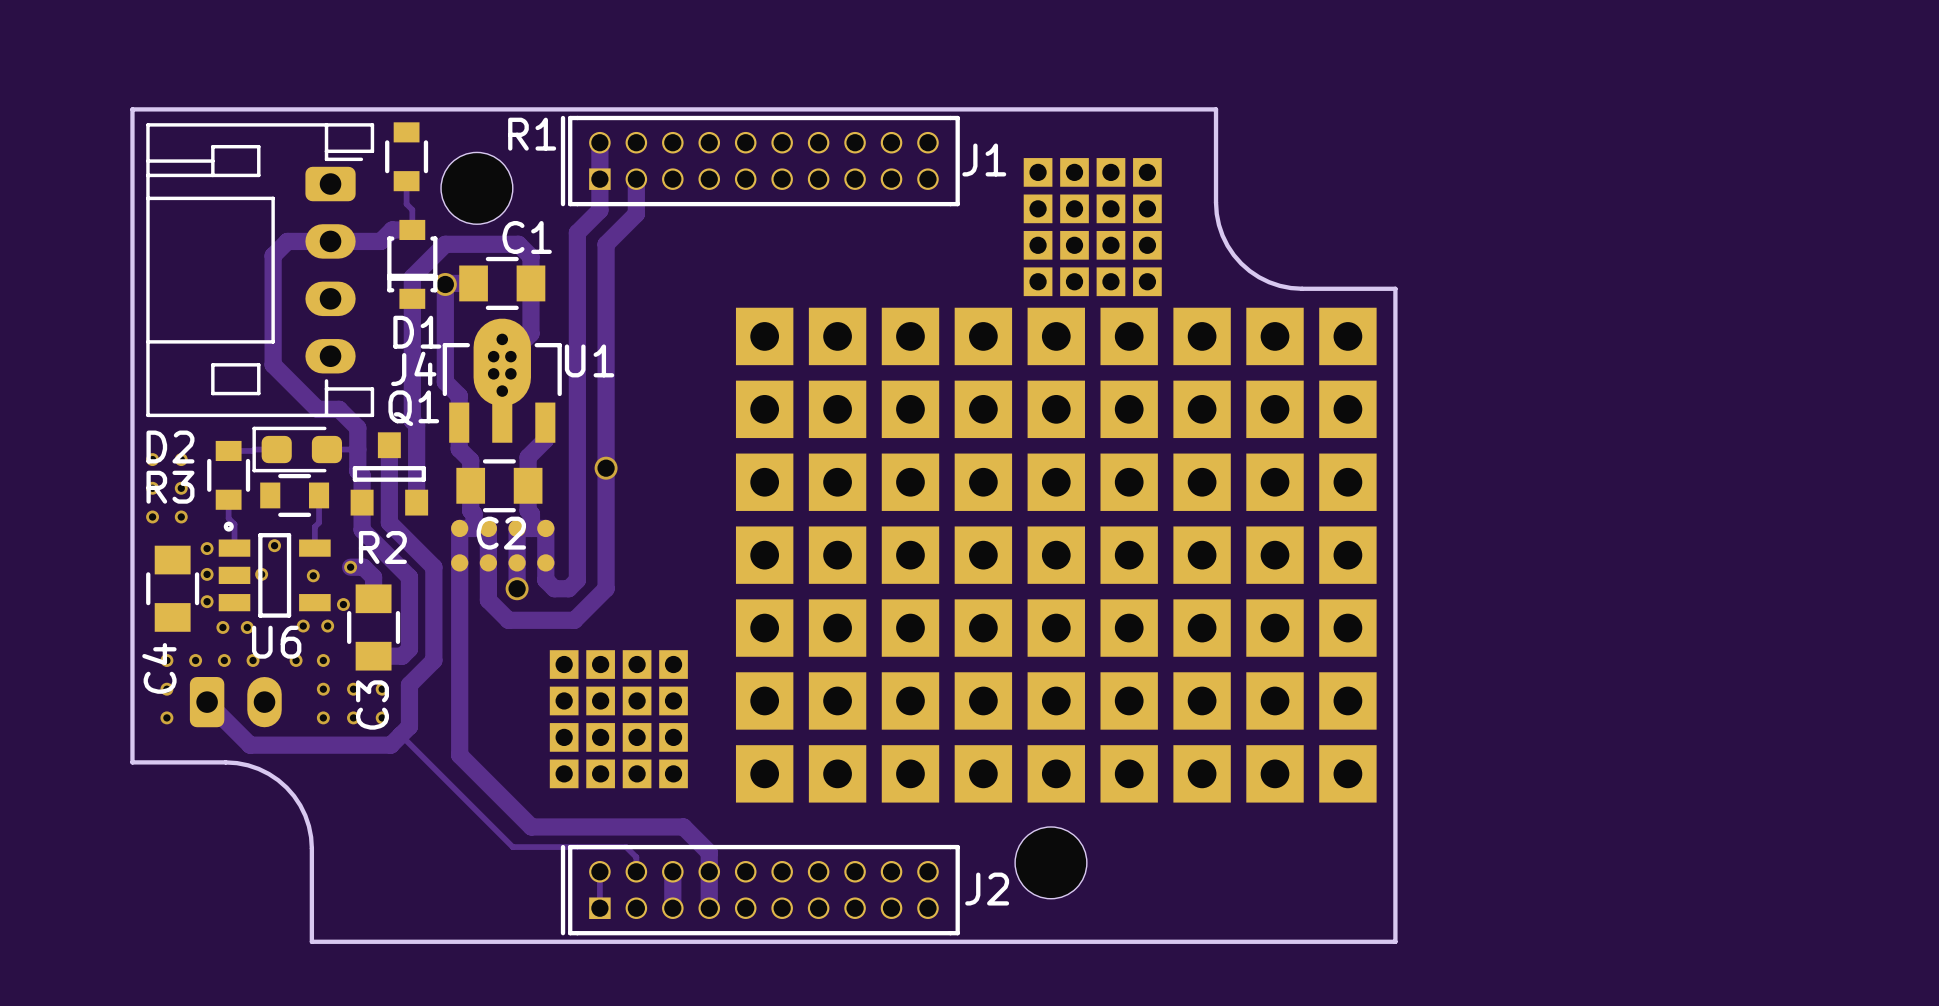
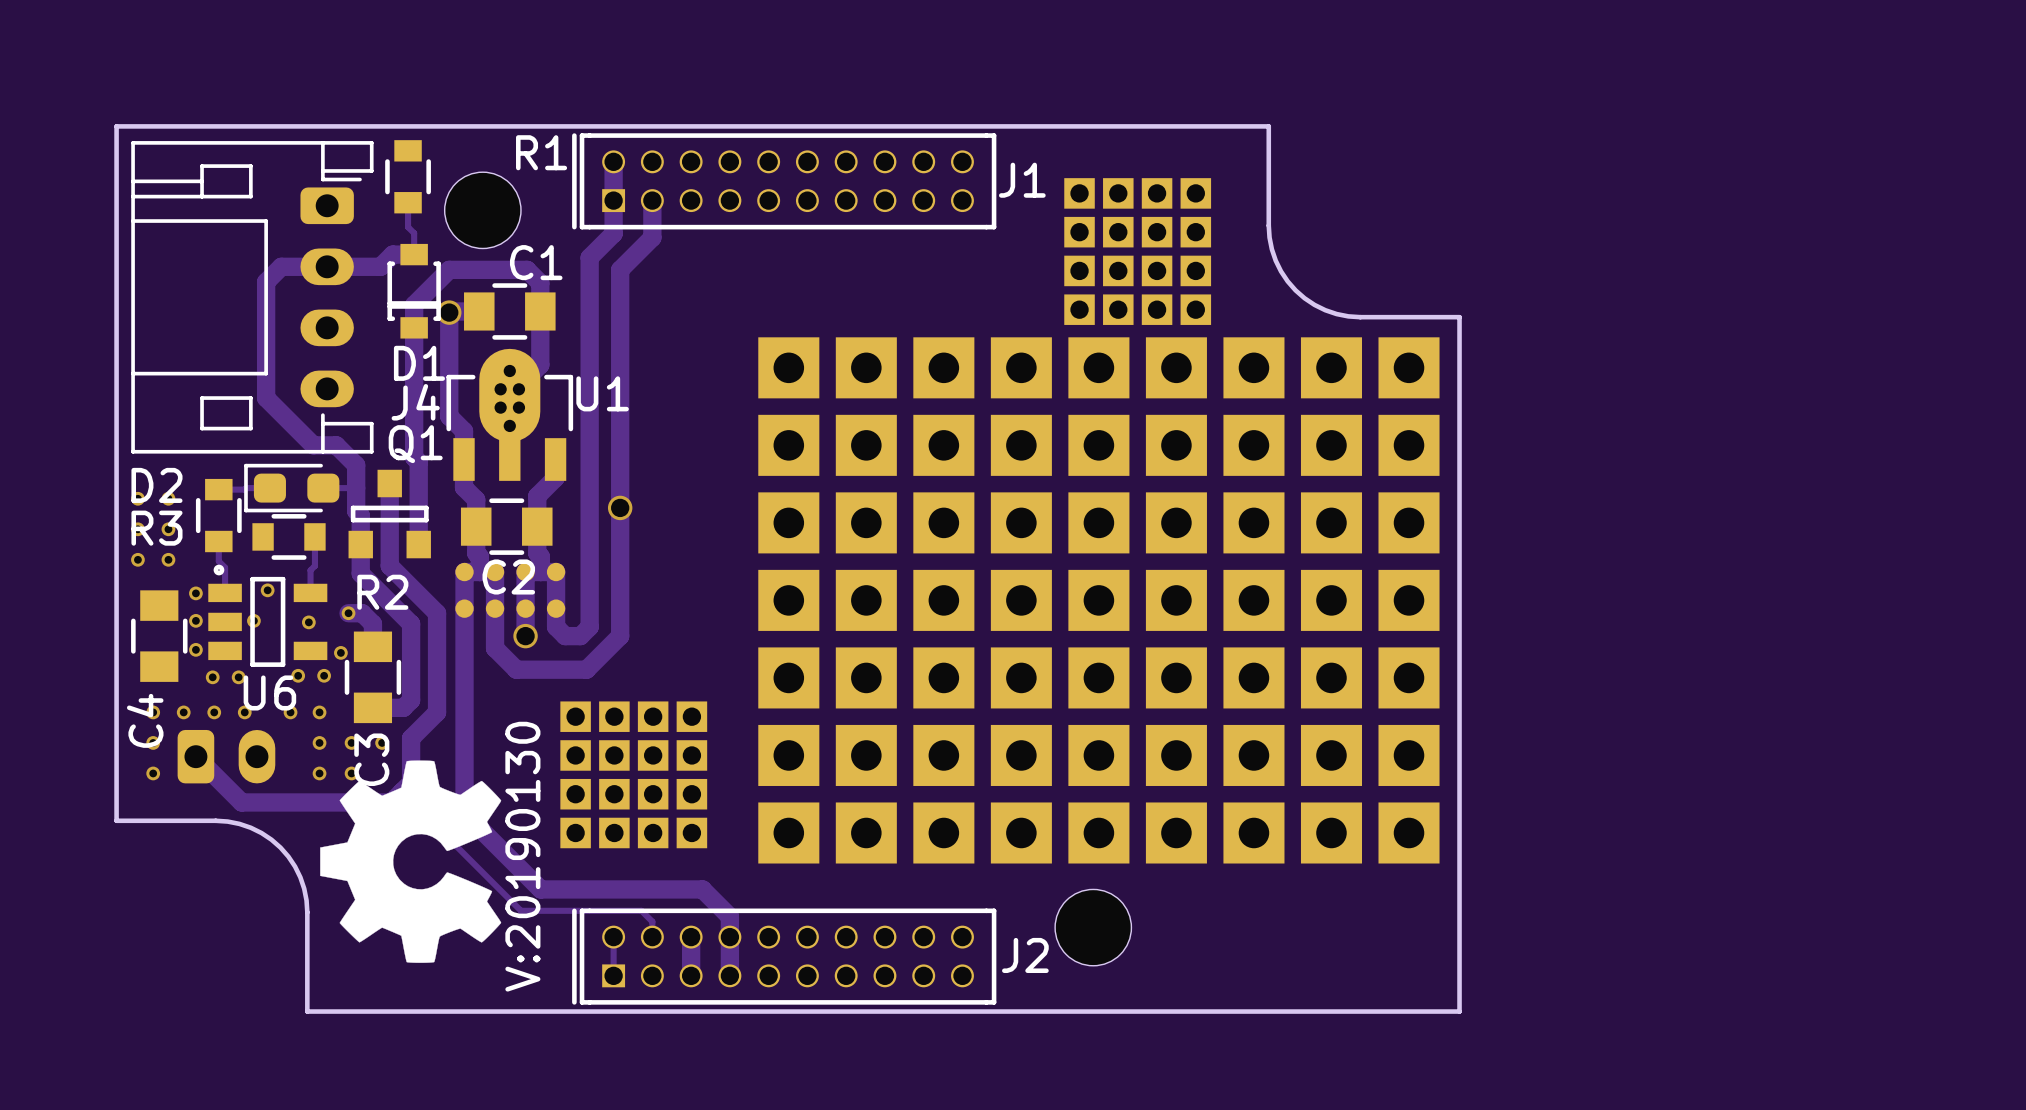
drawing: none -> [320, 760, 502, 963]
via: (382, 717) -> none

